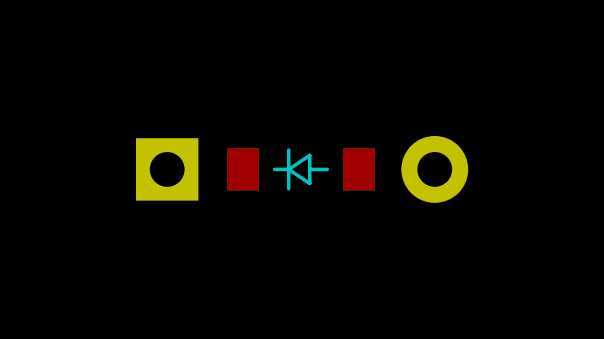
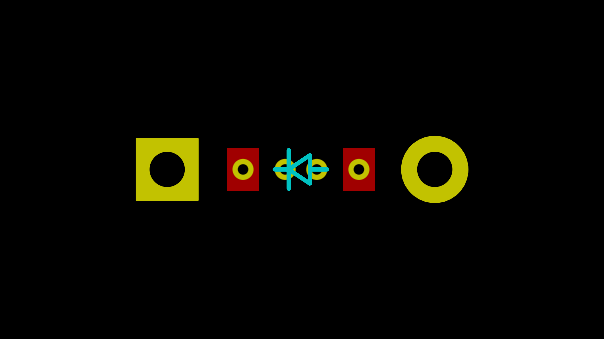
part: none -> (300, 169)
part: none -> (300, 169)
part: none -> (300, 169)
part: none -> (302, 169)

